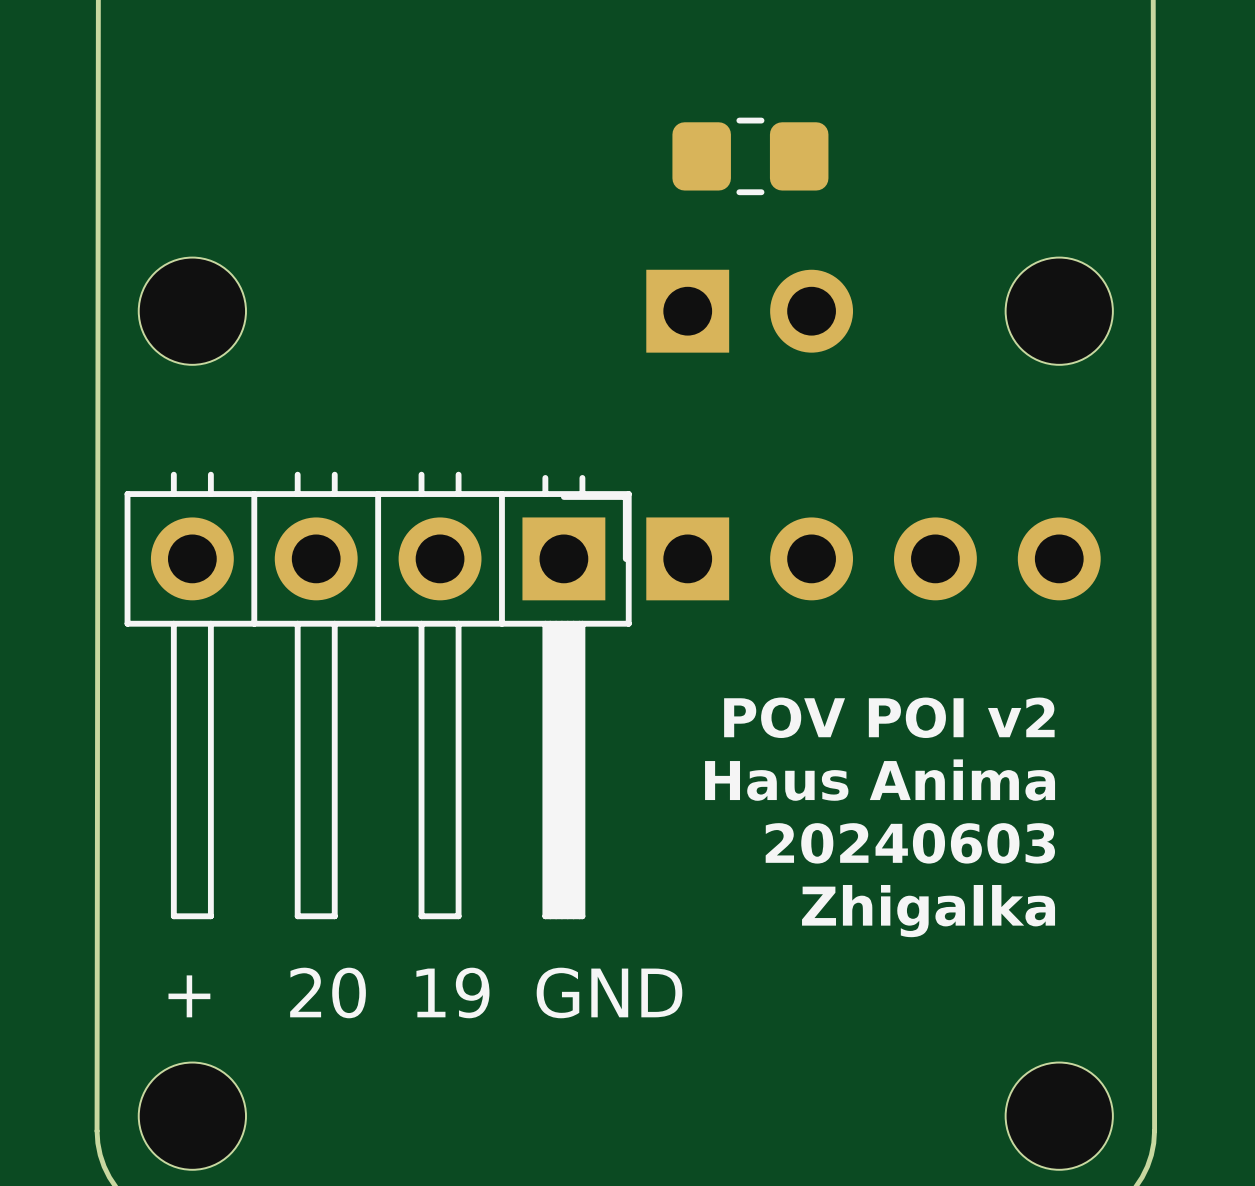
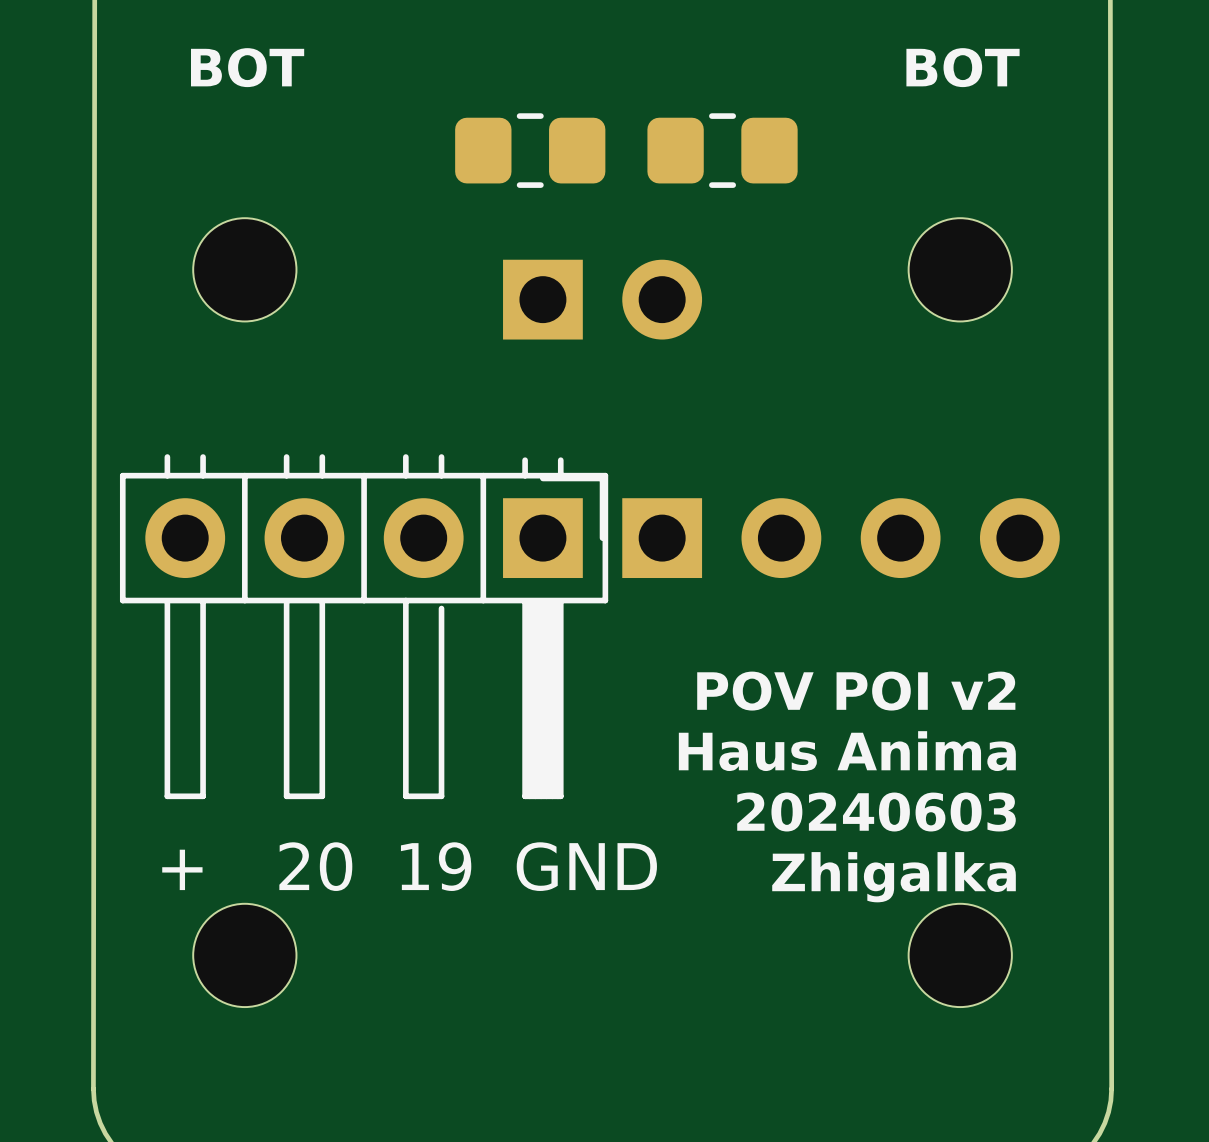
text: none -> BOT (247, 67)
text: none -> BOT (963, 67)
part: none -> (530, 150)
part position: (192, 311) -> (244, 269)
part position: (749, 311) -> (602, 299)
part position: (1059, 311) -> (960, 269)
part footprint: [124, 471, 632, 920] -> [119, 454, 609, 800]
text position: 20 (328, 992) -> 20 (315, 866)
text position: 19 (452, 992) -> 19 (436, 866)
text position: GND (609, 992) -> GND (586, 866)
text position: + (189, 996) -> + (182, 869)
part position: (192, 1116) -> (244, 955)
part position: (1059, 1116) -> (960, 955)

